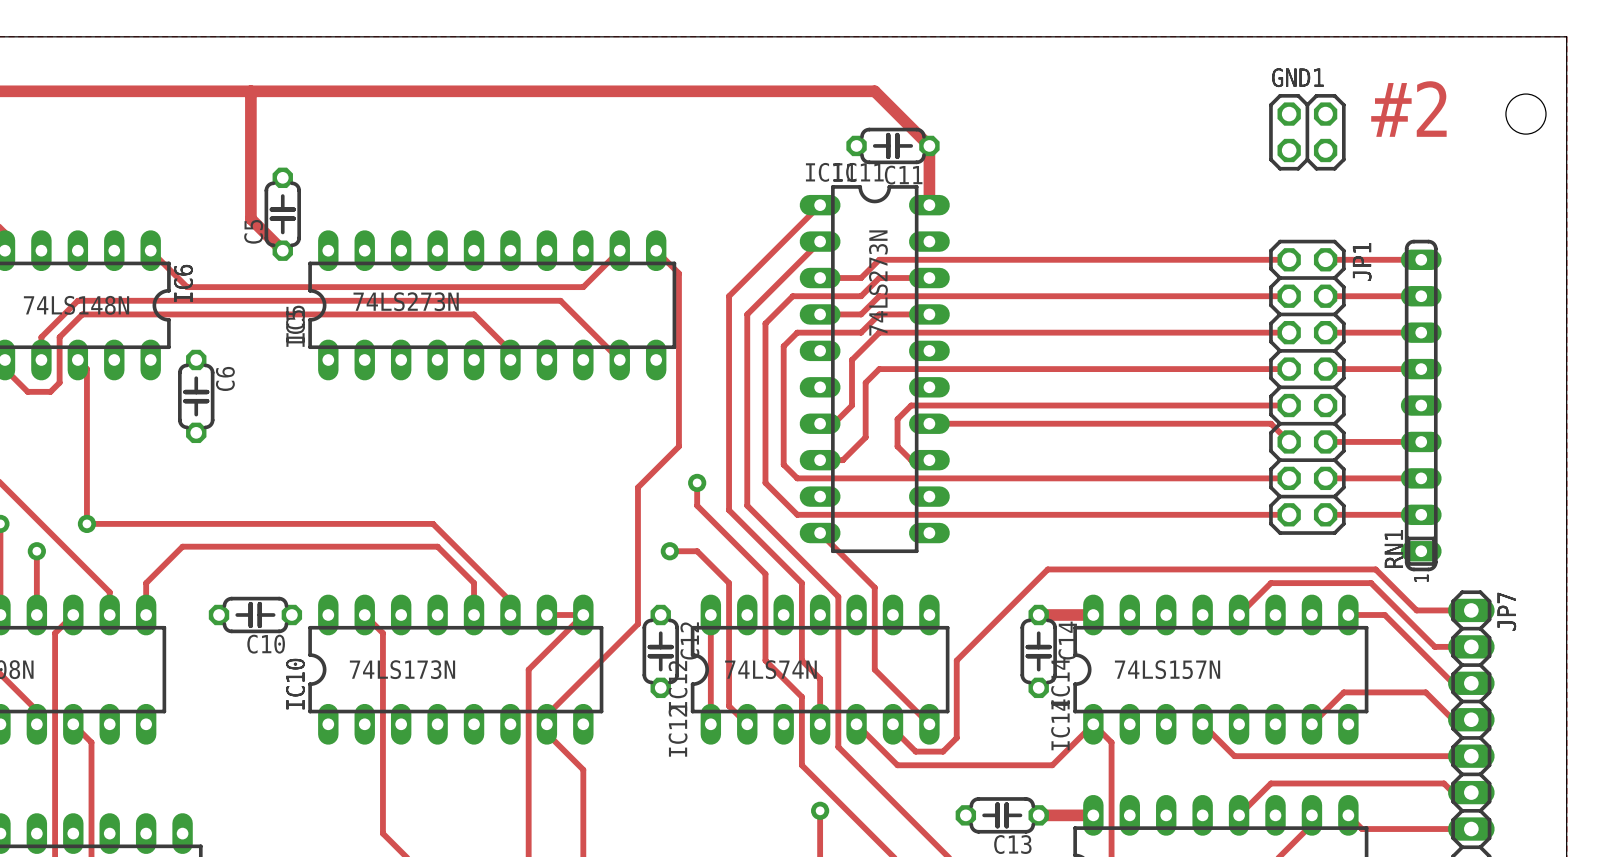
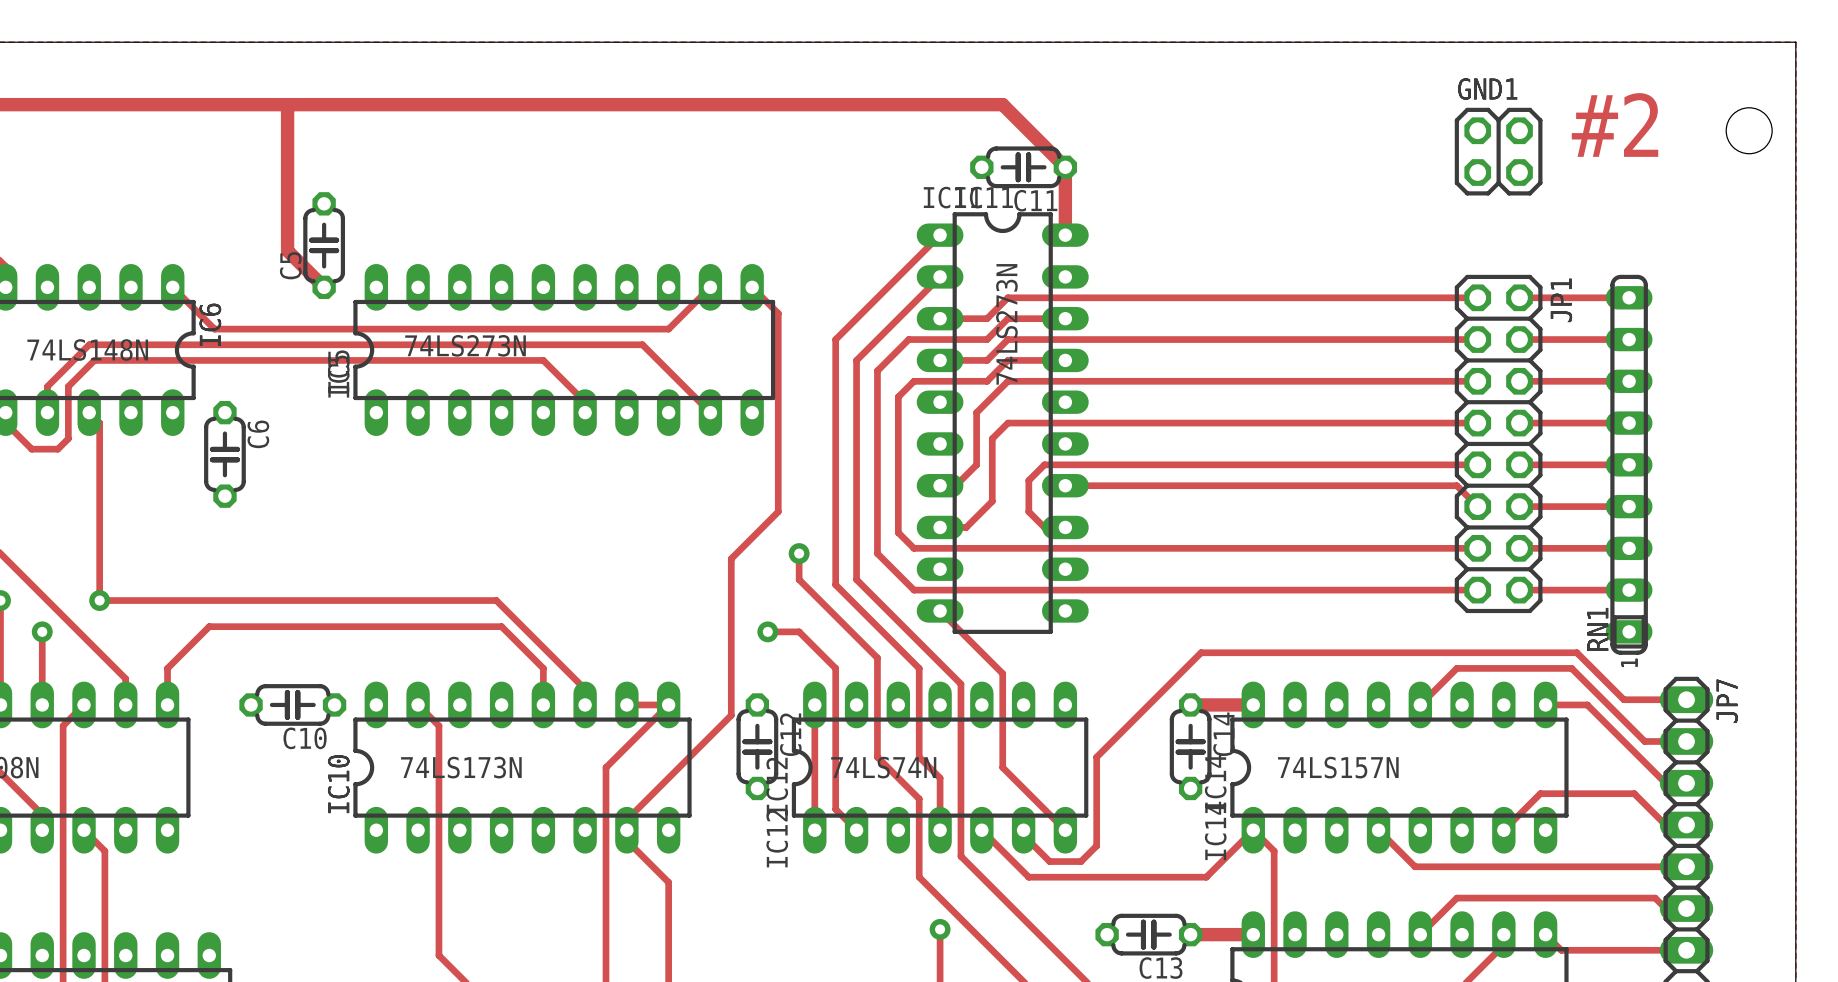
track: none -> (1519, 464) (1629, 464)

